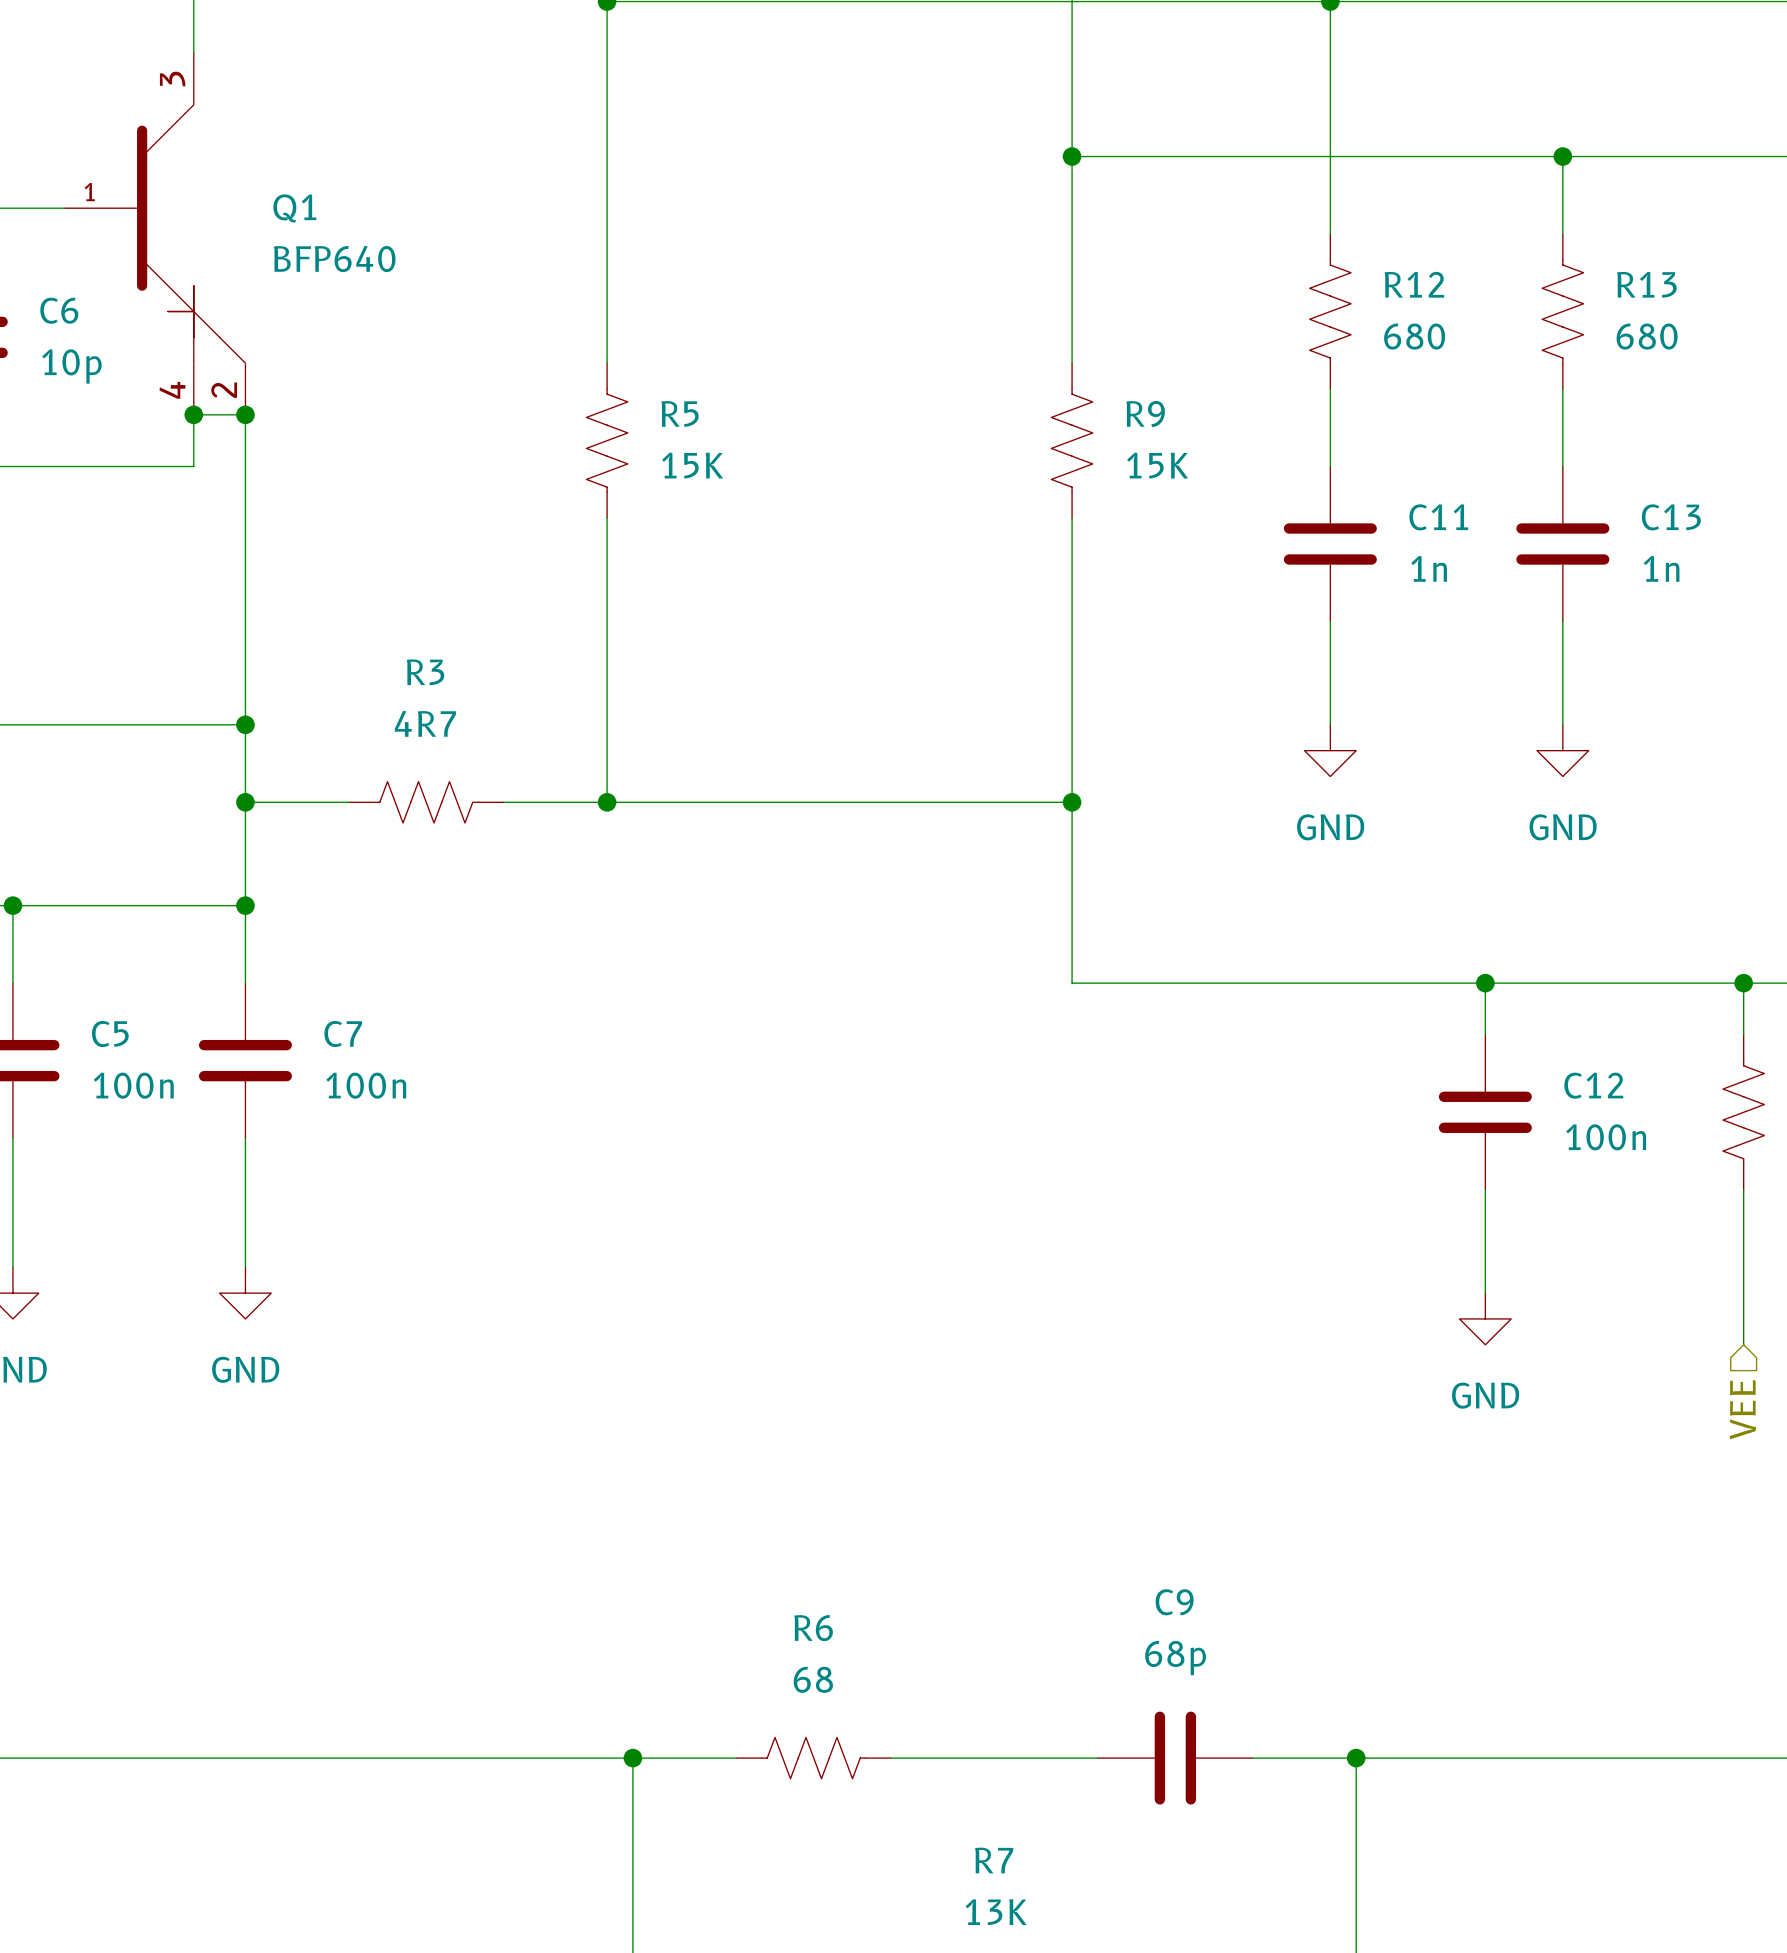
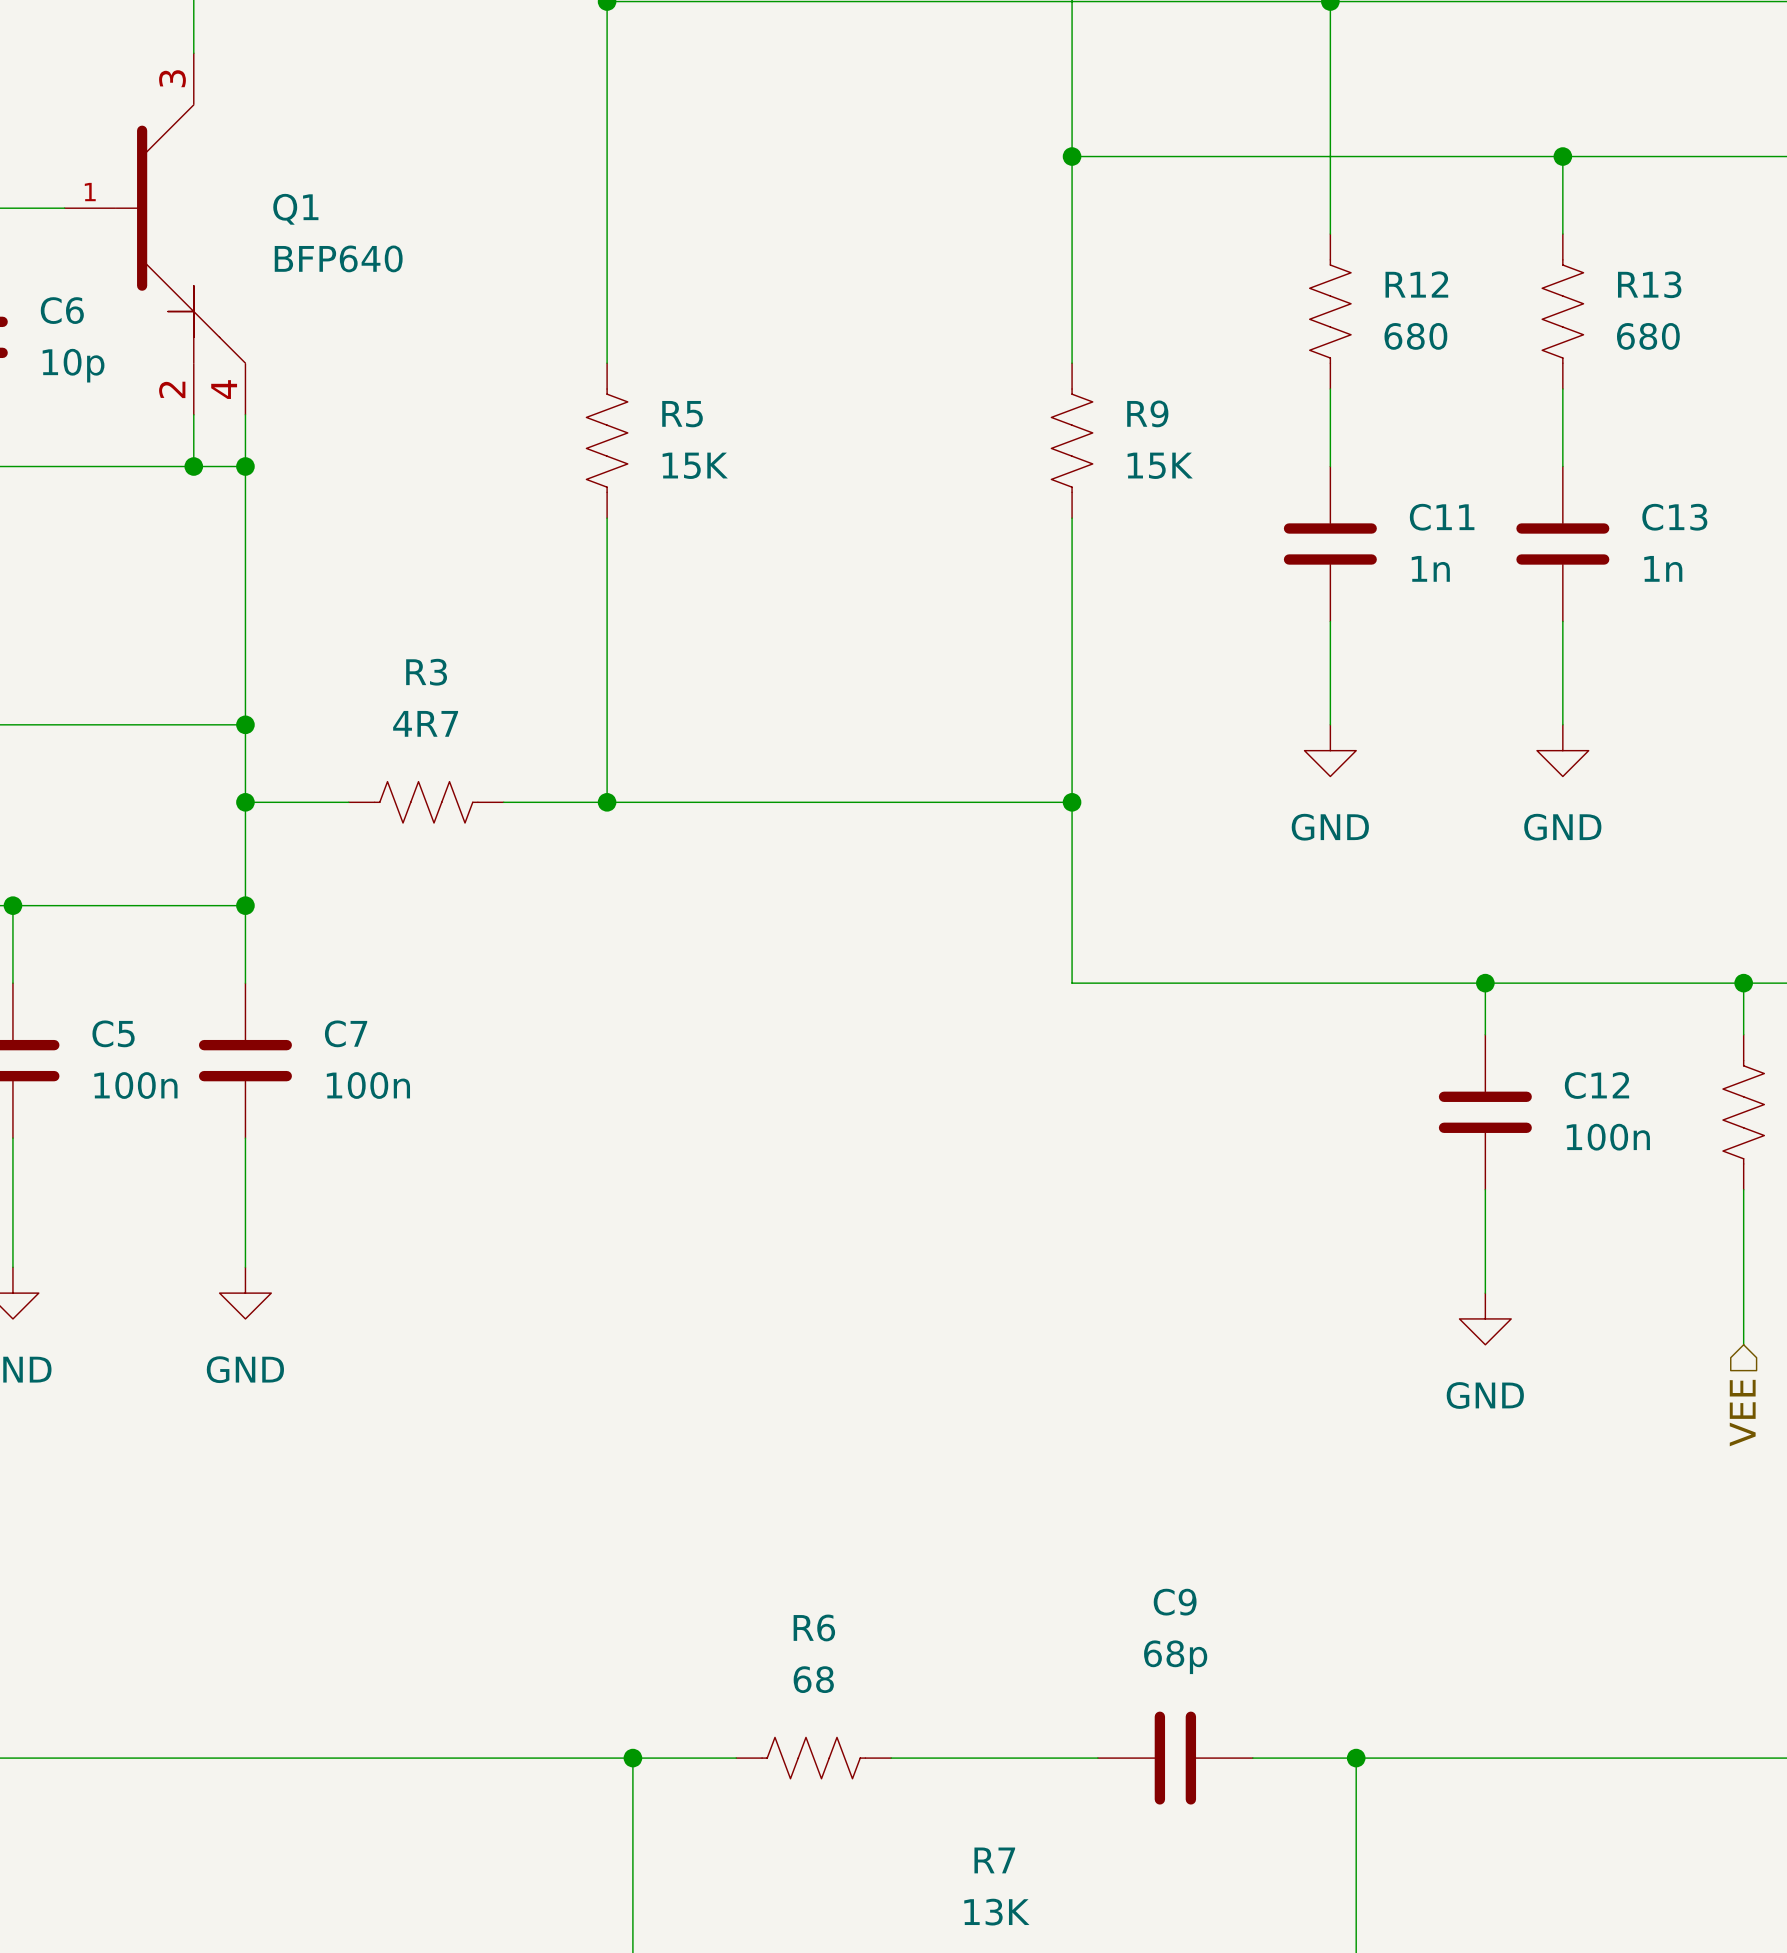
Q1 pin number: 4 (172, 390) -> 2 (172, 389)
Q1 pin number: 2 (224, 390) -> 4 (224, 389)
wire: (193, 414) (245, 414) -> (193, 466) (245, 466)
junction: (193, 414) -> none
junction: (245, 414) -> none
junction: none -> (193, 466)
junction: none -> (245, 466)

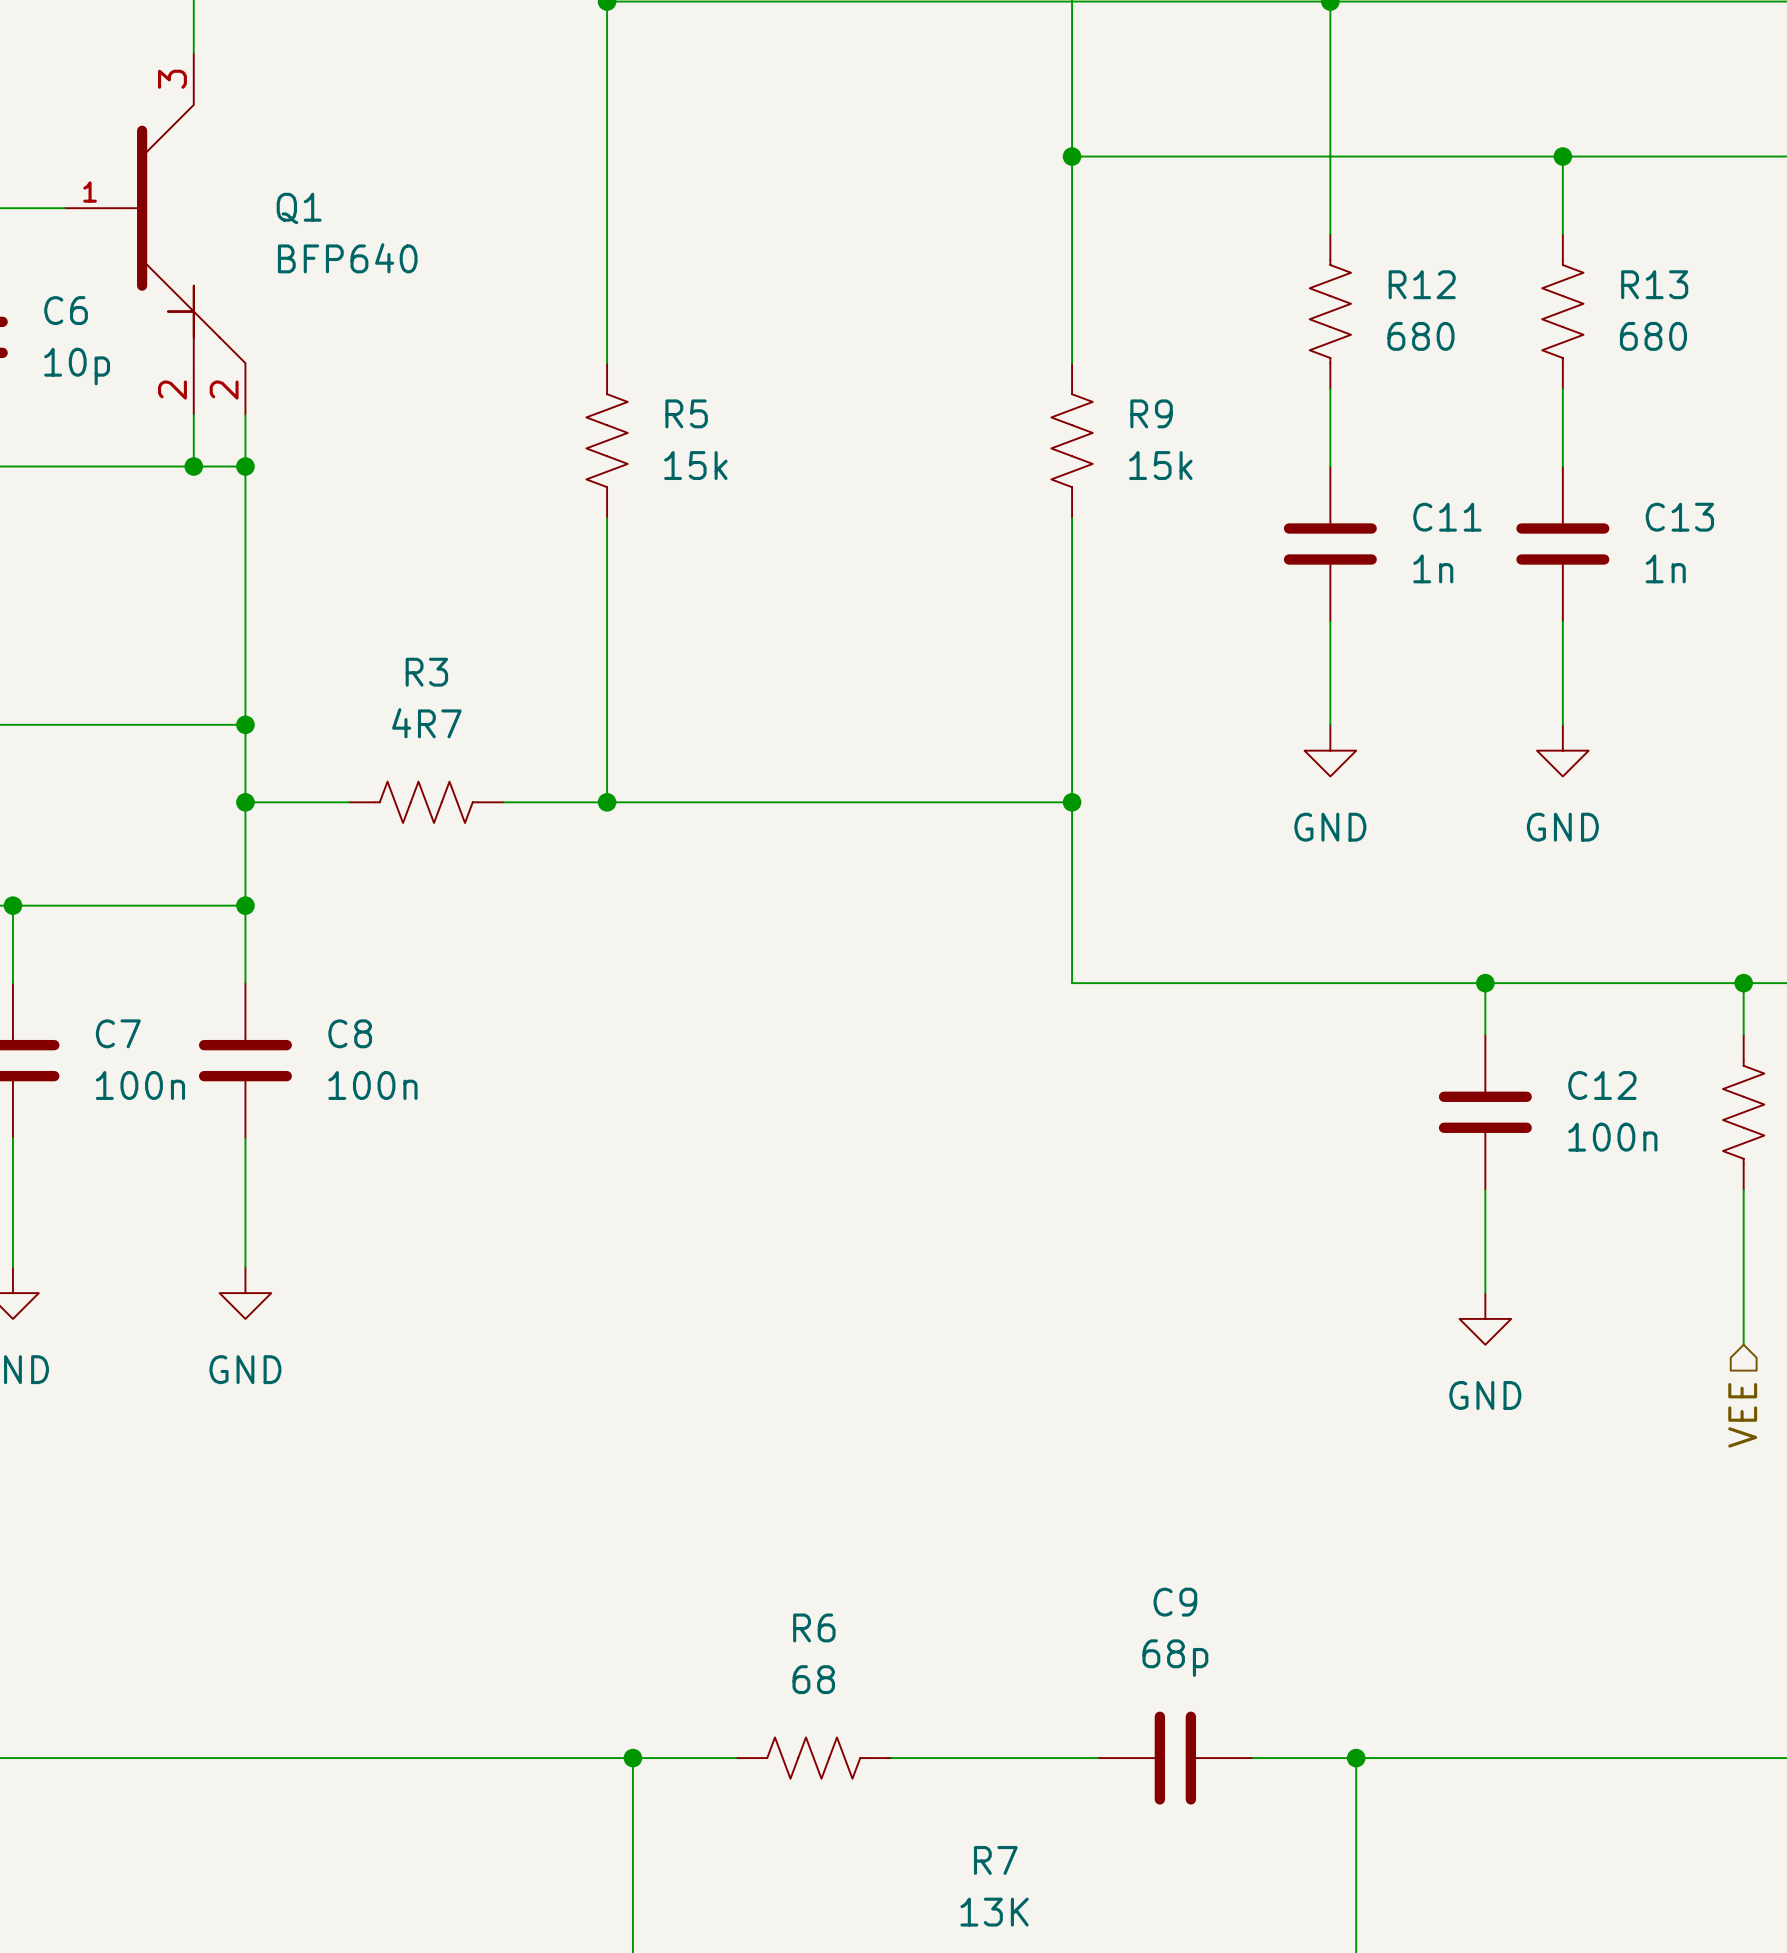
Q1 pin number: 4 (224, 389) -> 2 (224, 390)
R5 value: 15K (695, 465) -> 15k (695, 465)
R9 value: 15K (1160, 465) -> 15k (1160, 465)
C5 name: C5 (113, 1033) -> C7 (118, 1033)
C7 name: C7 (346, 1033) -> C8 (350, 1033)

